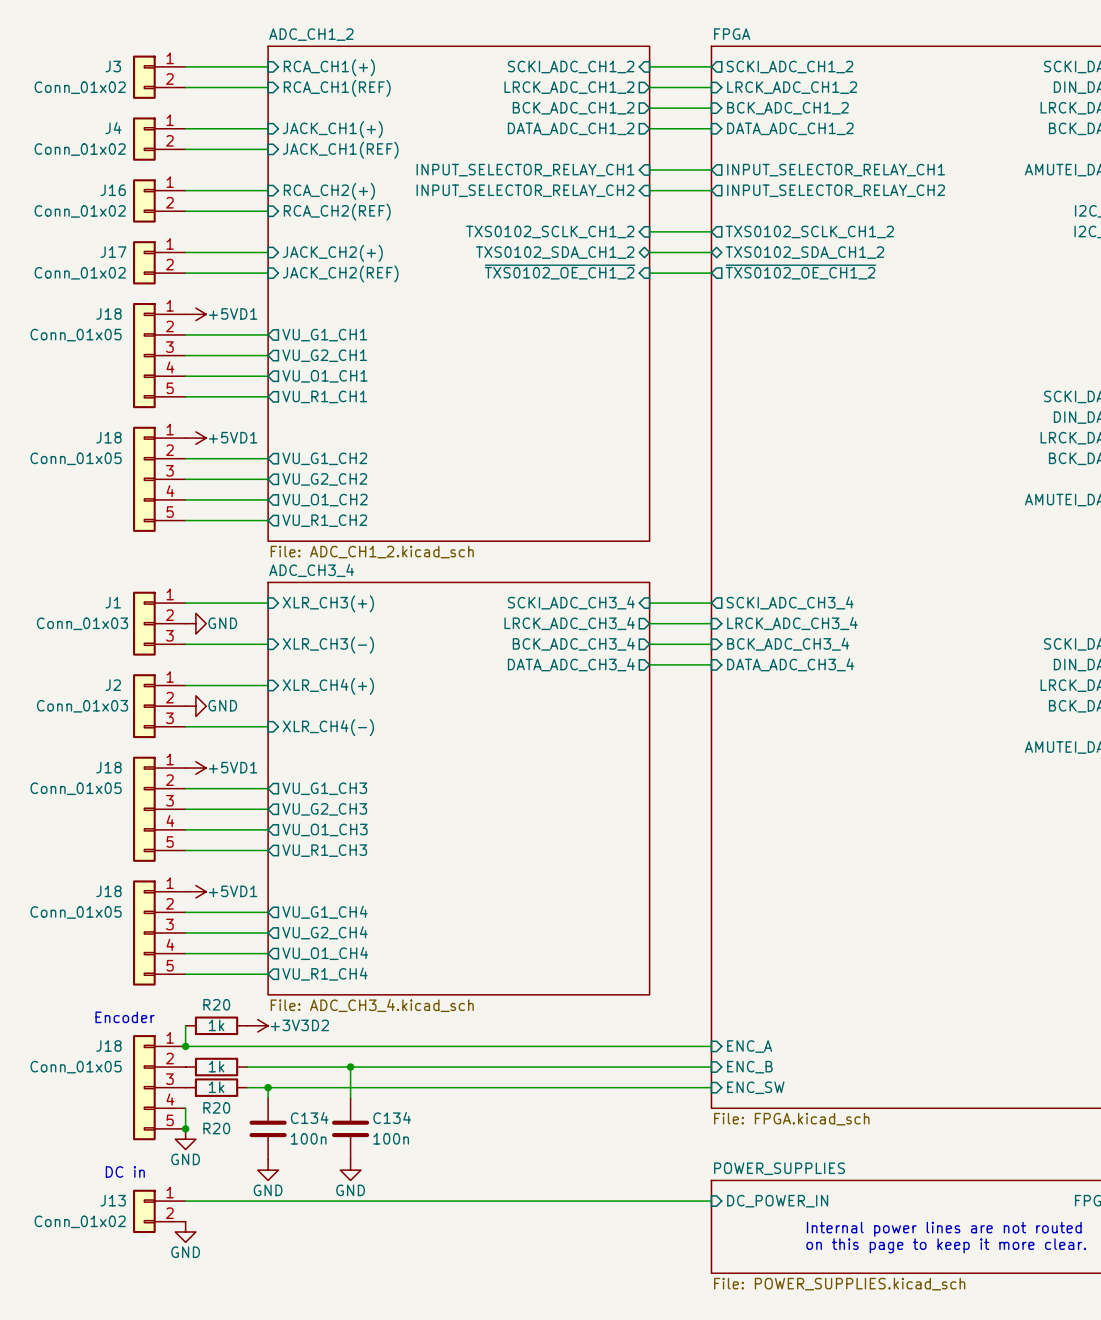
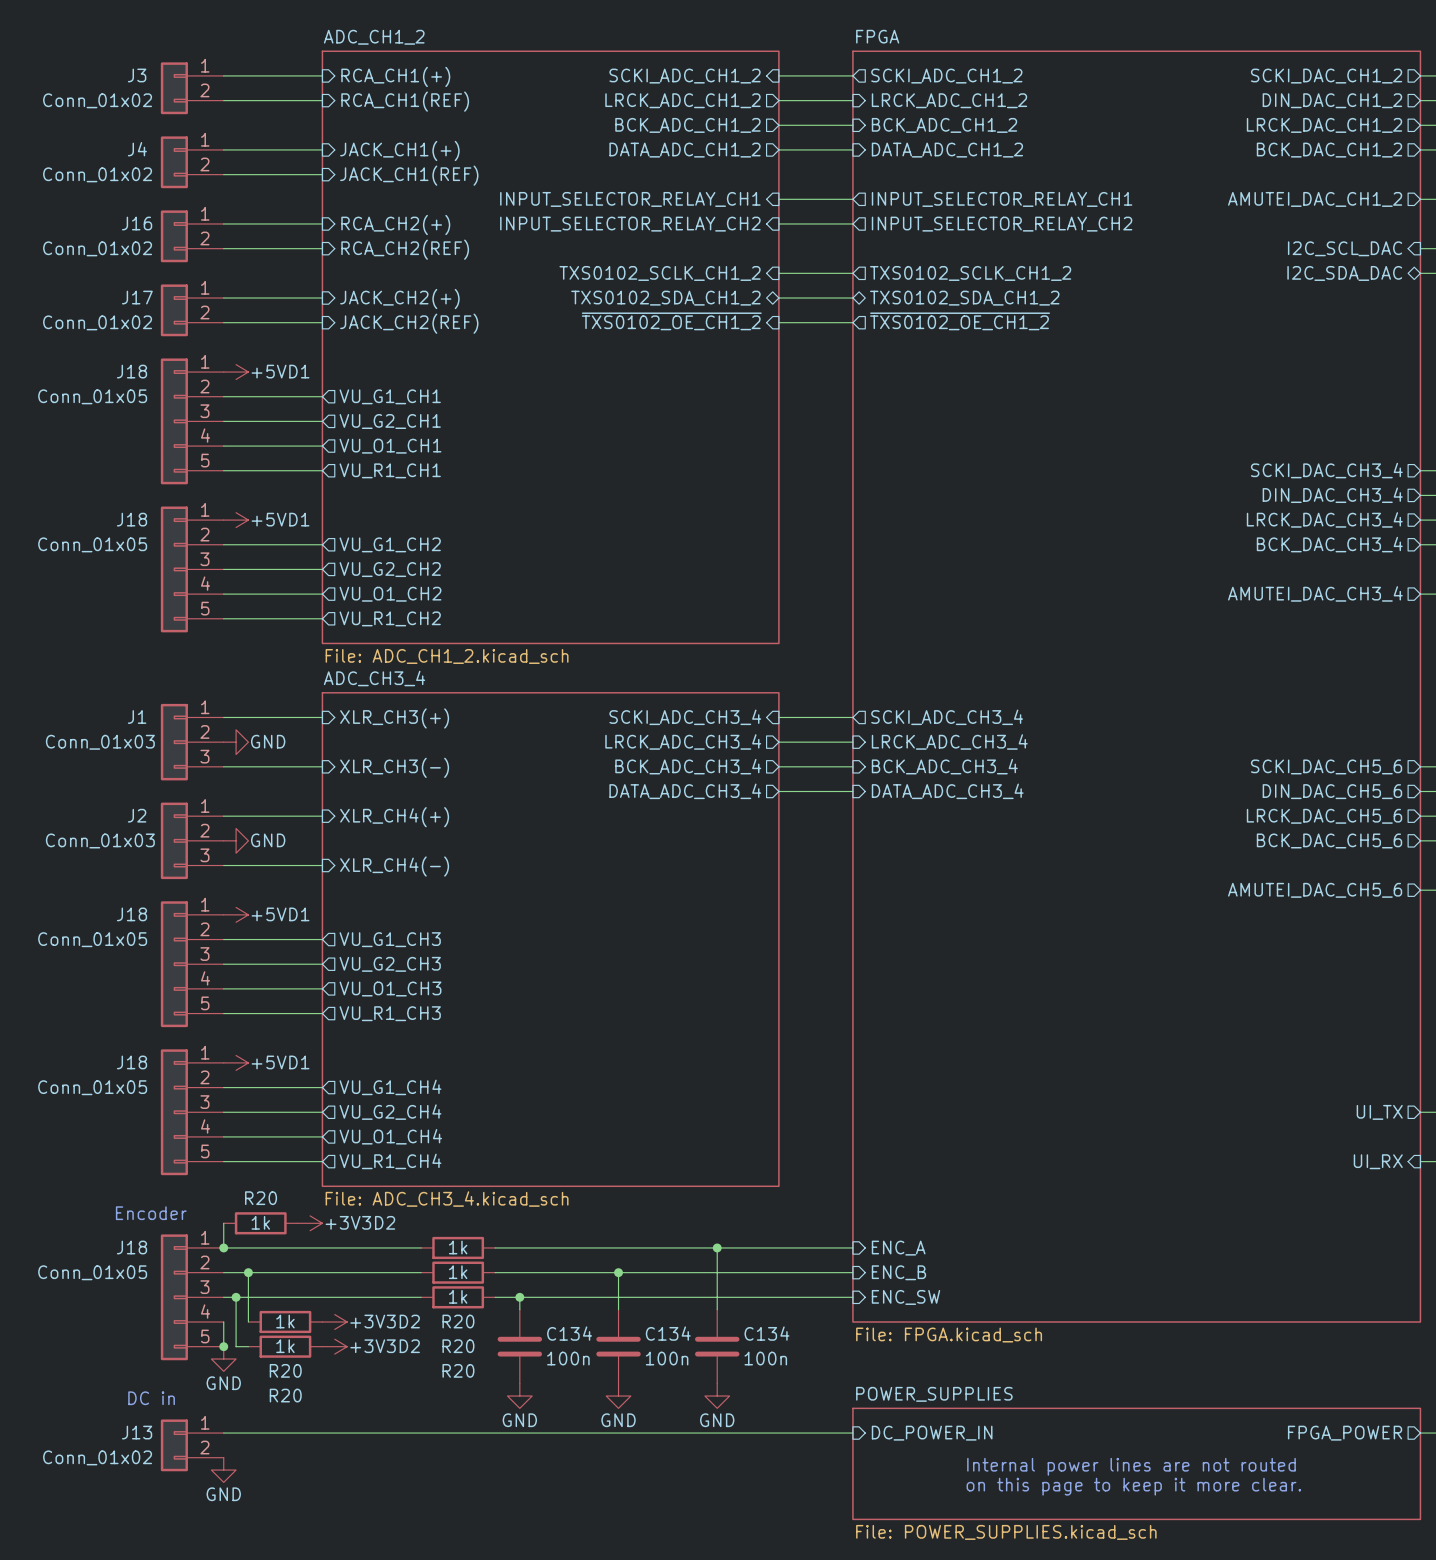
wire: (350, 1046) (412, 1046) -> (223, 1272) (297, 1272)
R20: none -> 1k (458, 1247)
wire: none -> (717, 1247) (717, 1309)
junction: none -> (717, 1247)
wire: none -> (248, 1272) (248, 1321)
junction: none -> (248, 1272)
R20: 1k (216, 1067) -> none
junction: (350, 1067) -> none
R20: none -> 1k (458, 1272)
wire: (412, 1067) (350, 1067) (350, 1097) -> none
wire: none -> (618, 1272) (618, 1309)
junction: none -> (618, 1272)
wire: none -> (236, 1297) (236, 1346) (248, 1346)
junction: none -> (236, 1297)
R20: 1k (216, 1087) -> none
wire: (268, 1087) (268, 1097) -> (519, 1297) (519, 1309)
junction: (268, 1087) -> none
wire: (350, 1087) (412, 1087) -> (223, 1297) (297, 1297)
R20: none -> 1k (458, 1297)
junction: none -> (519, 1297)
R20: none -> 1k (285, 1321)
power symbol: none -> +3V3D2 (334, 1321)
R20: none -> 1k (285, 1346)
C134: 100n (268, 1128) -> none
power symbol: none -> +3V3D2 (334, 1346)
C134: 100n (350, 1128) -> none
C134: none -> 100n (519, 1346)
C134: none -> 100n (618, 1346)
C134: none -> 100n (717, 1346)
power symbol: GND (268, 1170) -> none
power symbol: GND (350, 1170) -> none
power symbol: none -> GND (519, 1396)
power symbol: none -> GND (618, 1396)
power symbol: none -> GND (717, 1396)

